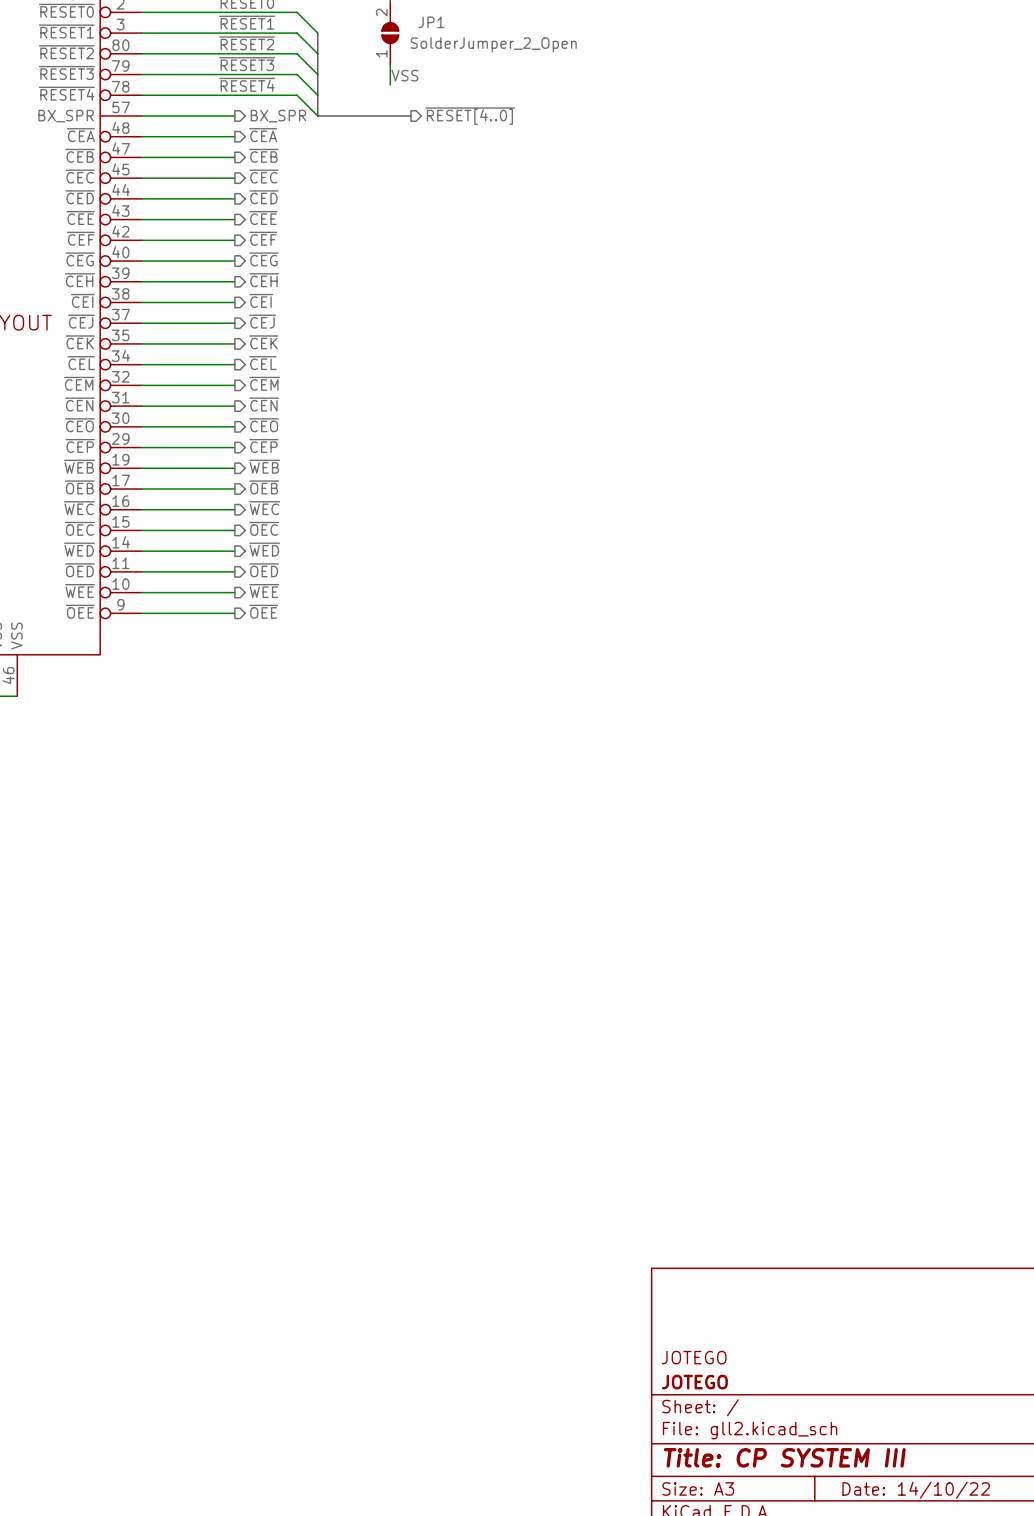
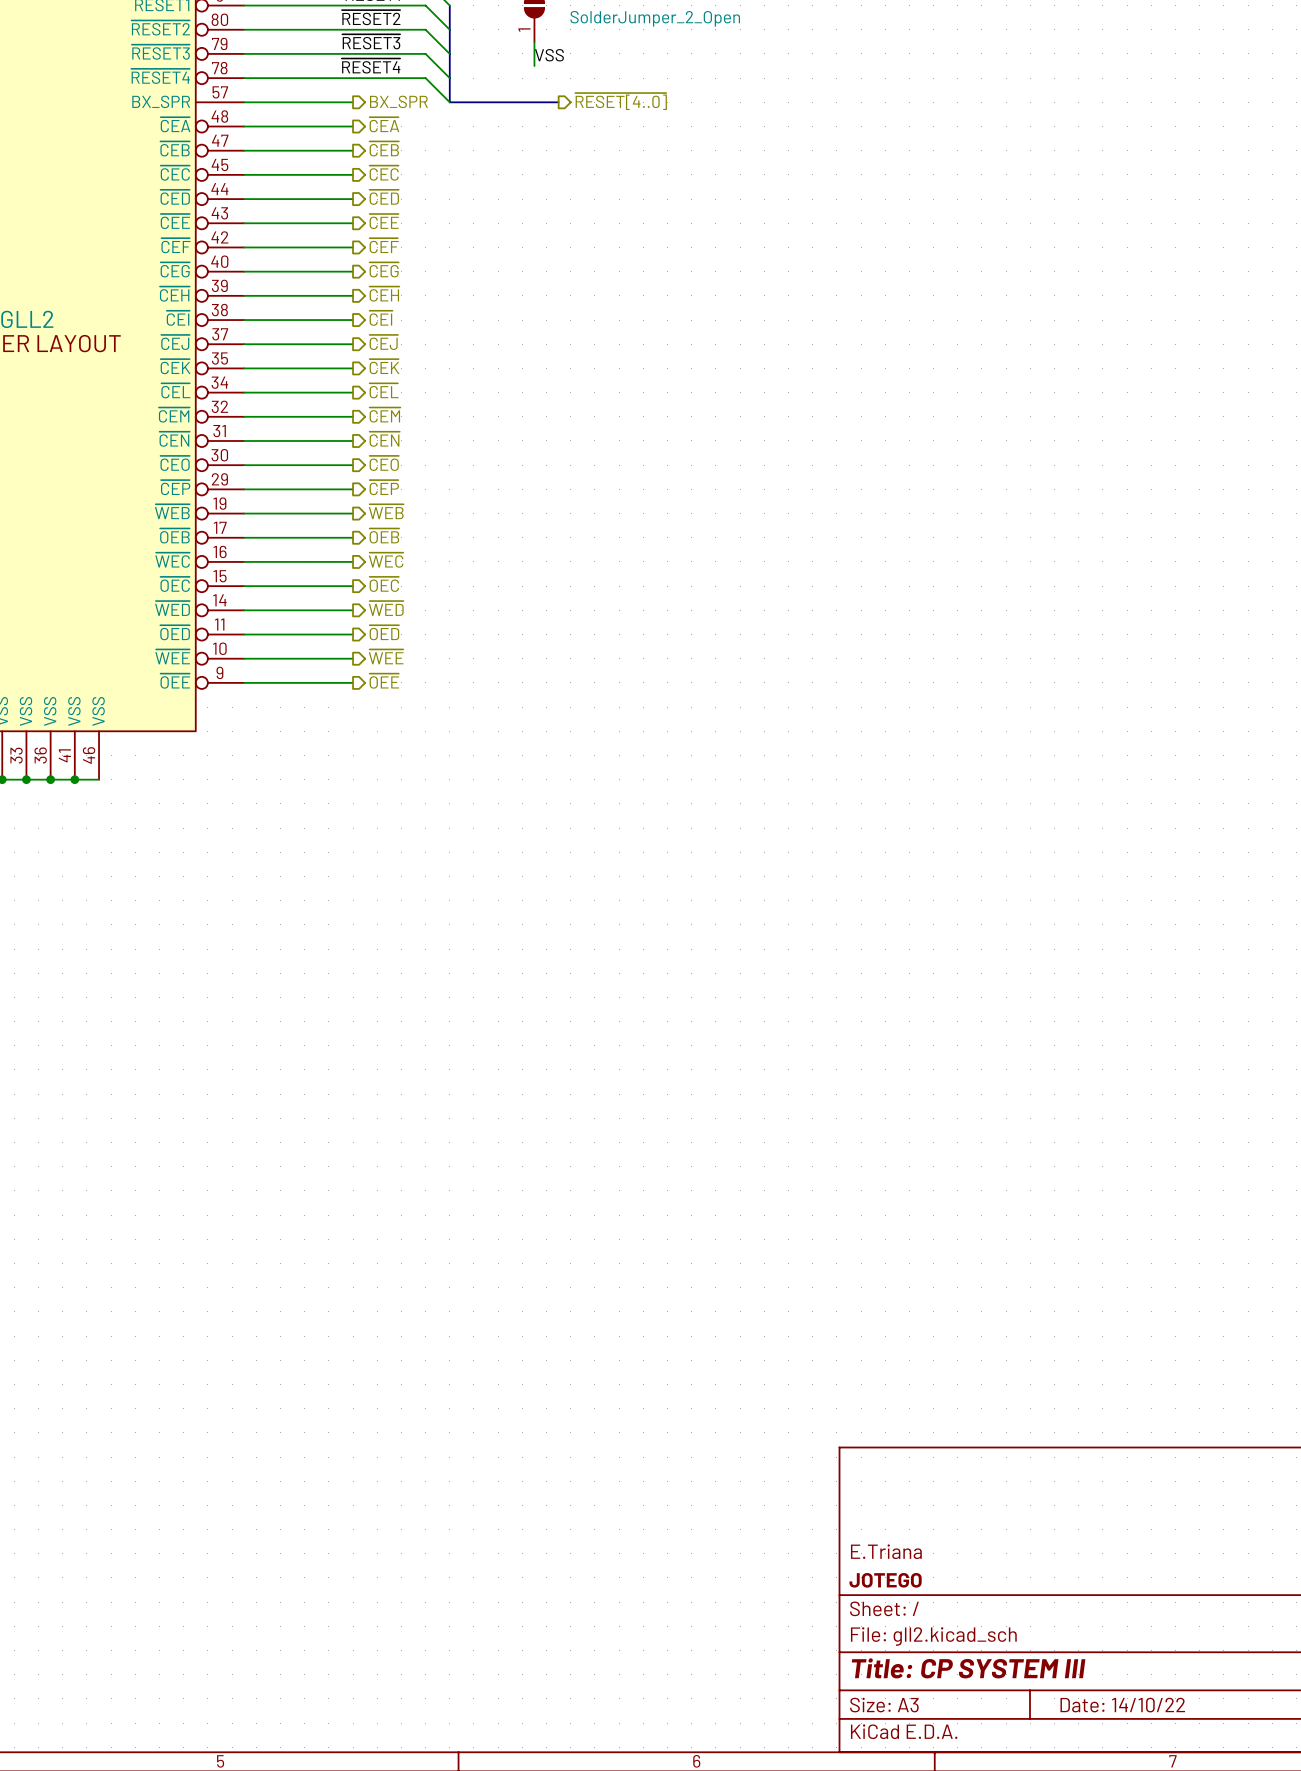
title block: JOTEGO (694, 1357) -> E.Triana (886, 1551)

